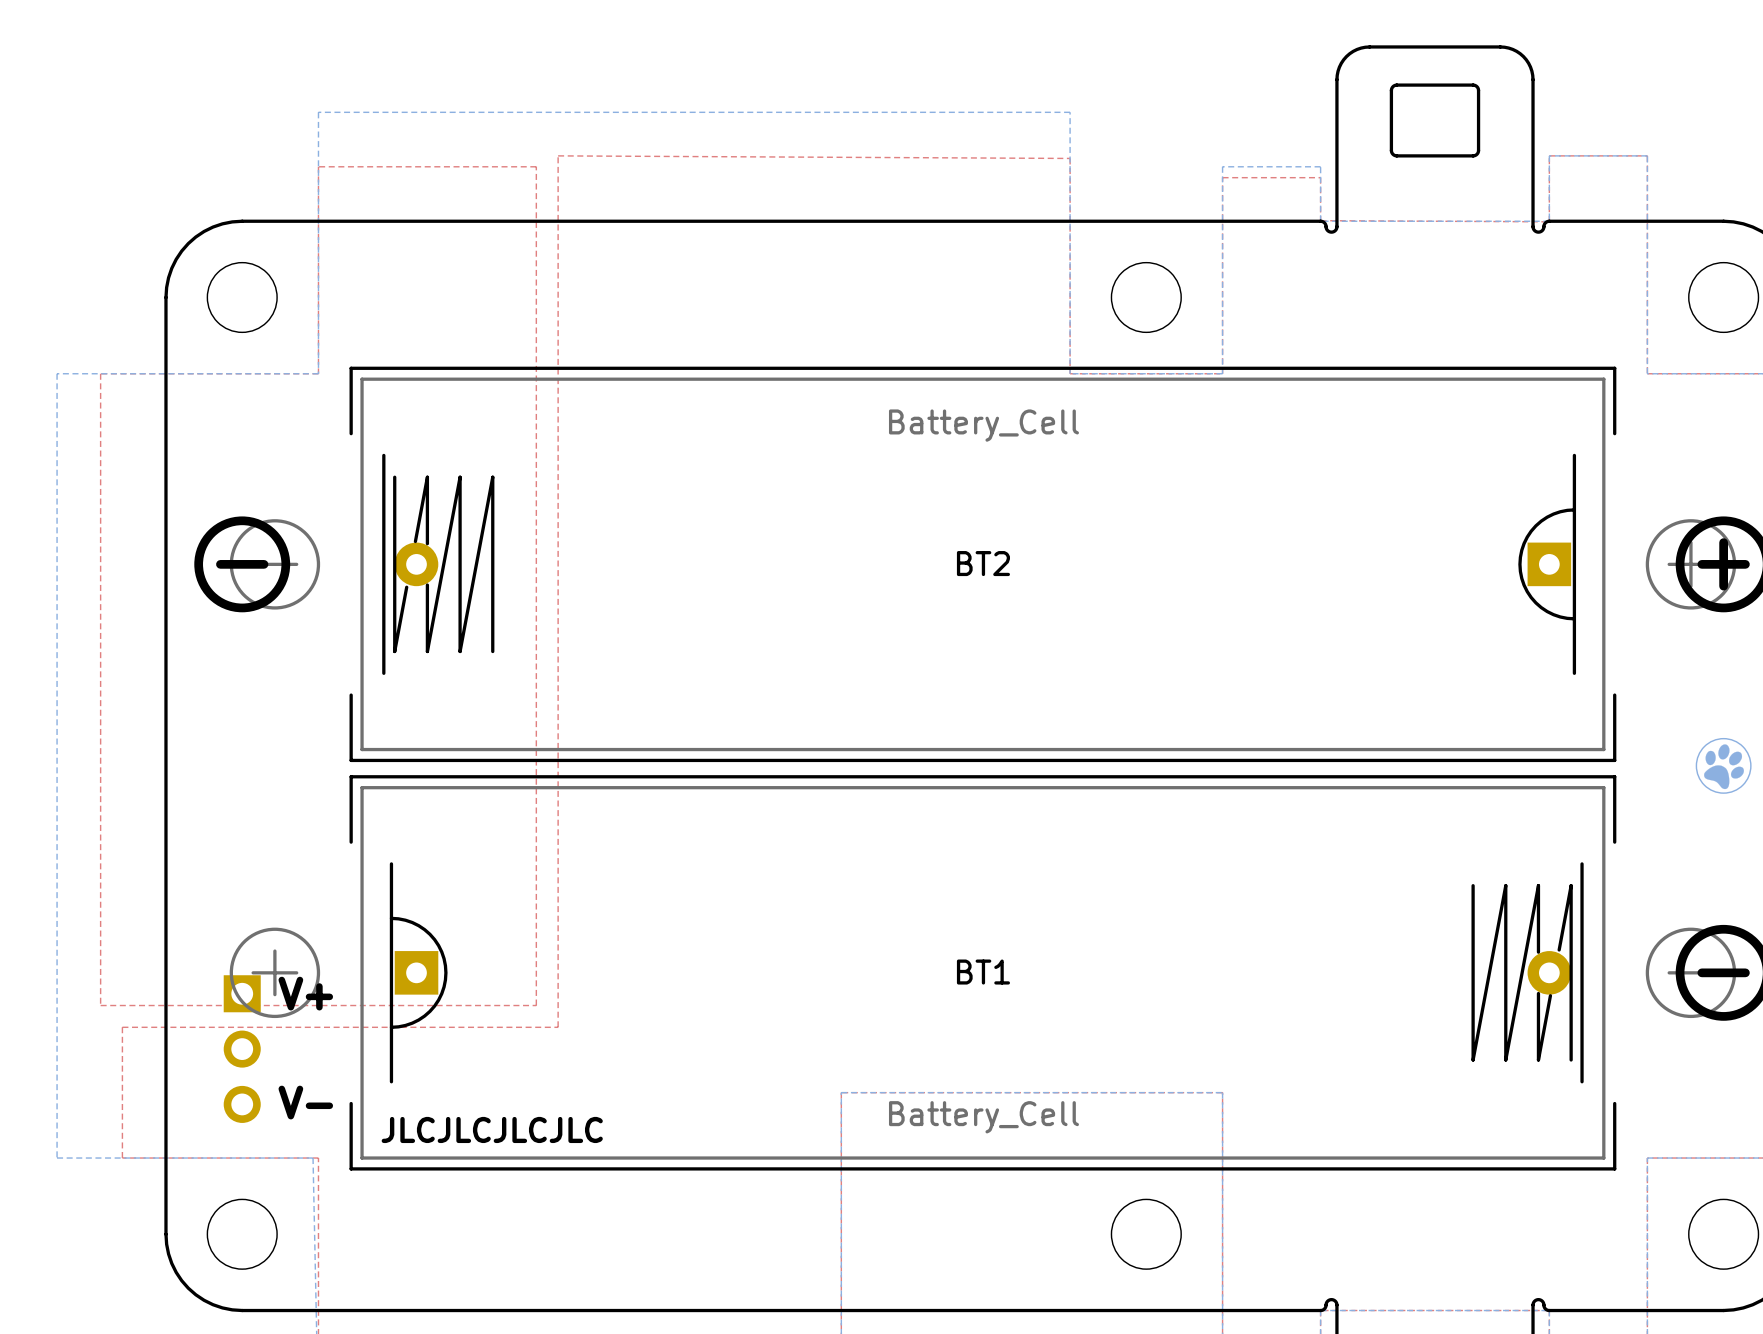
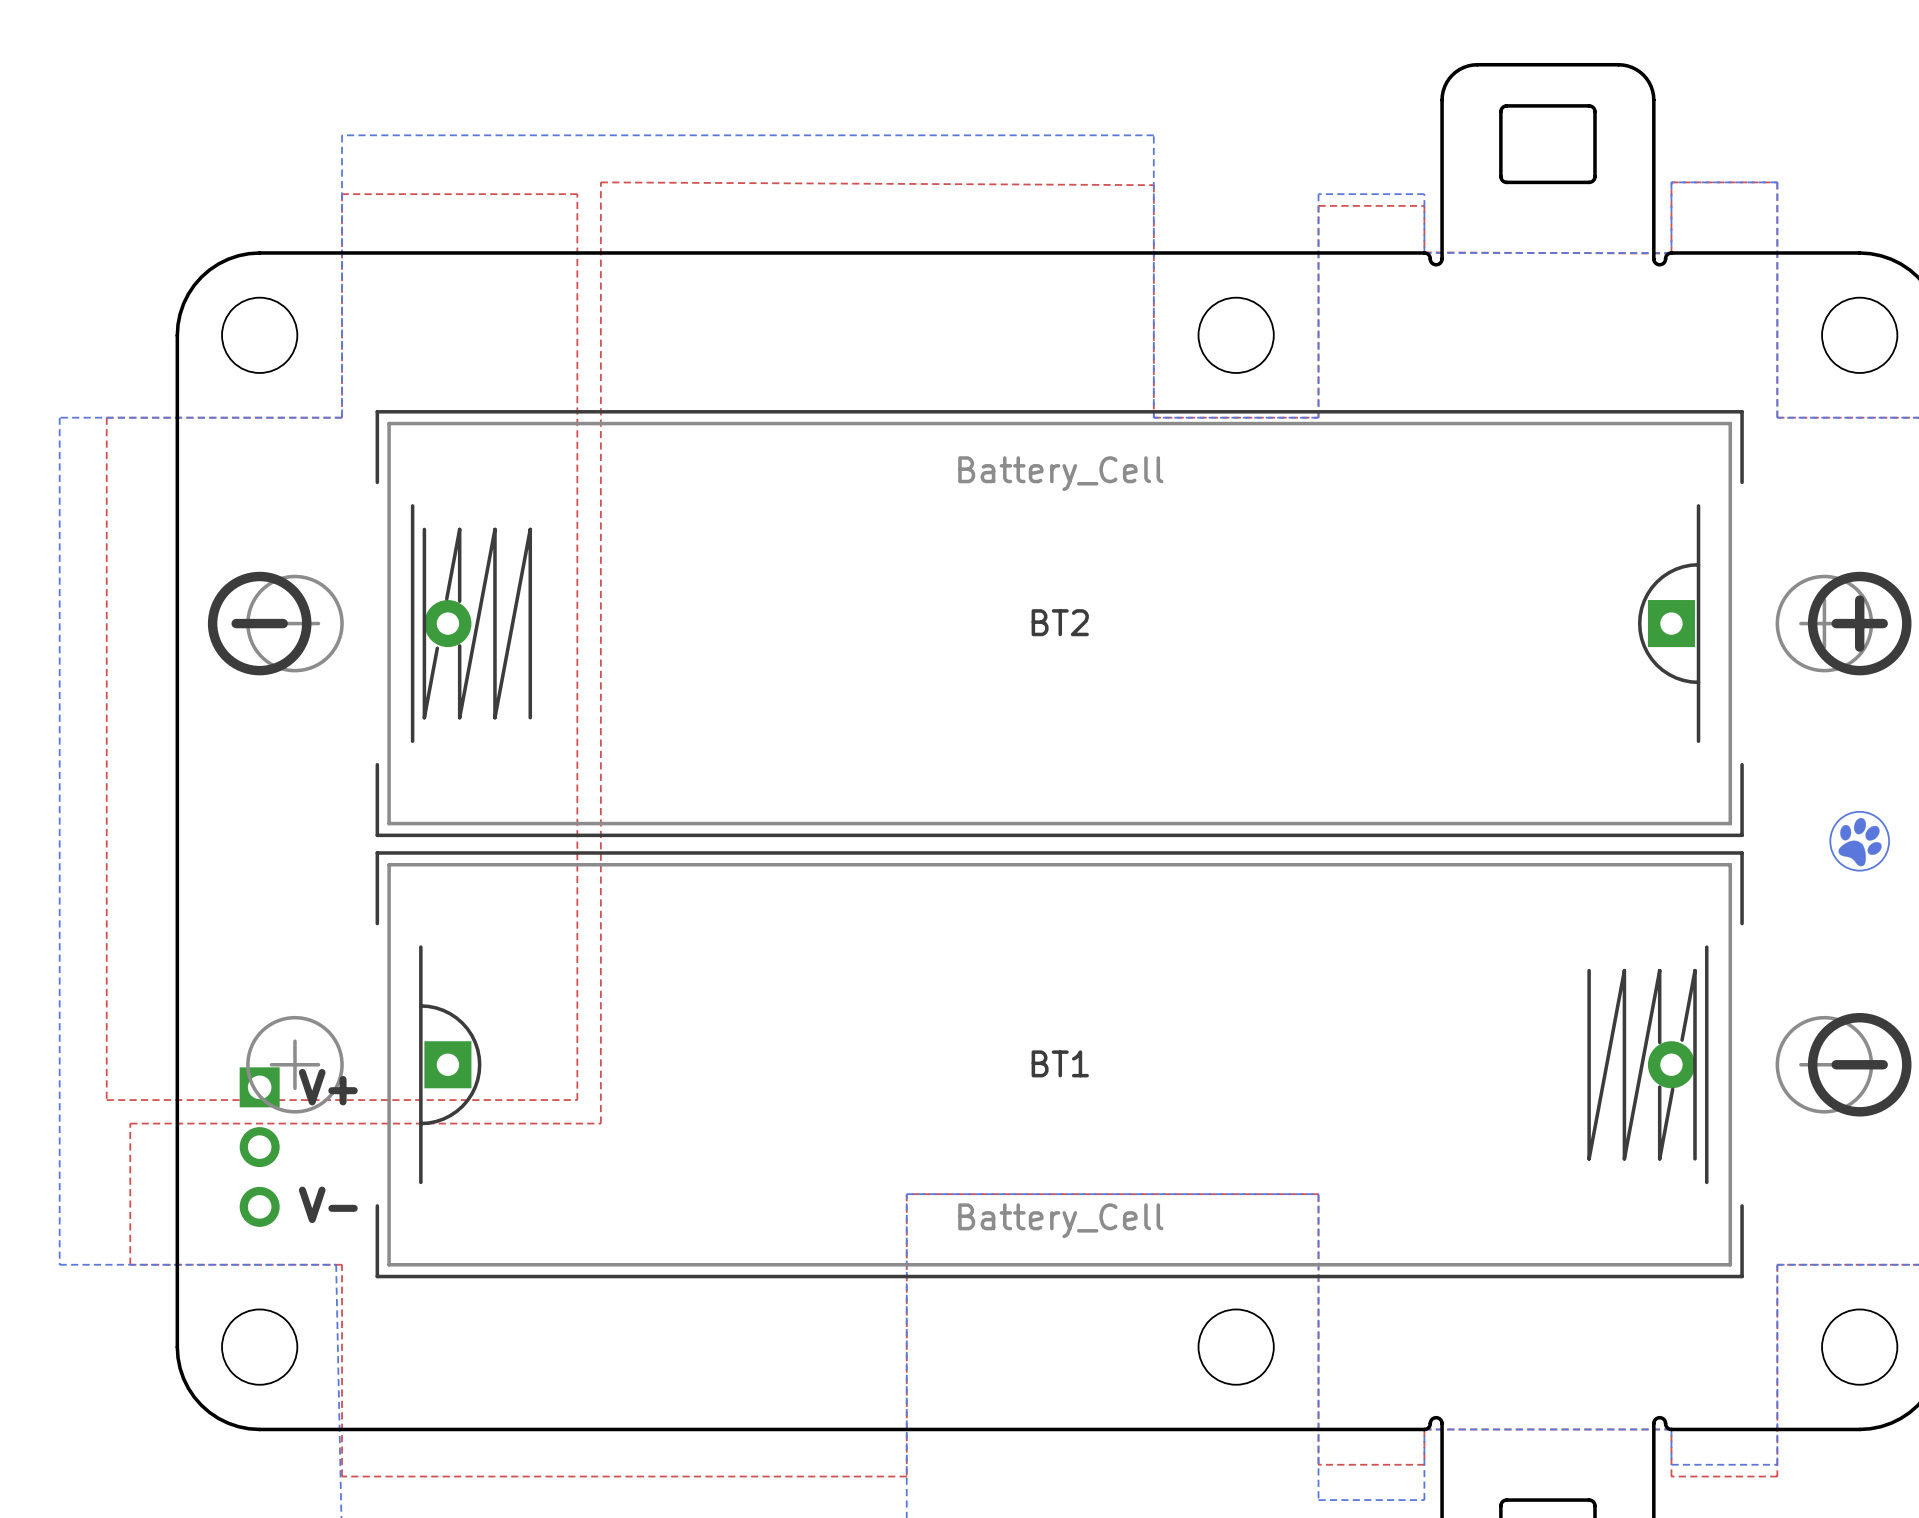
text: JLCJLCJLCJLC (492, 1129) -> none

